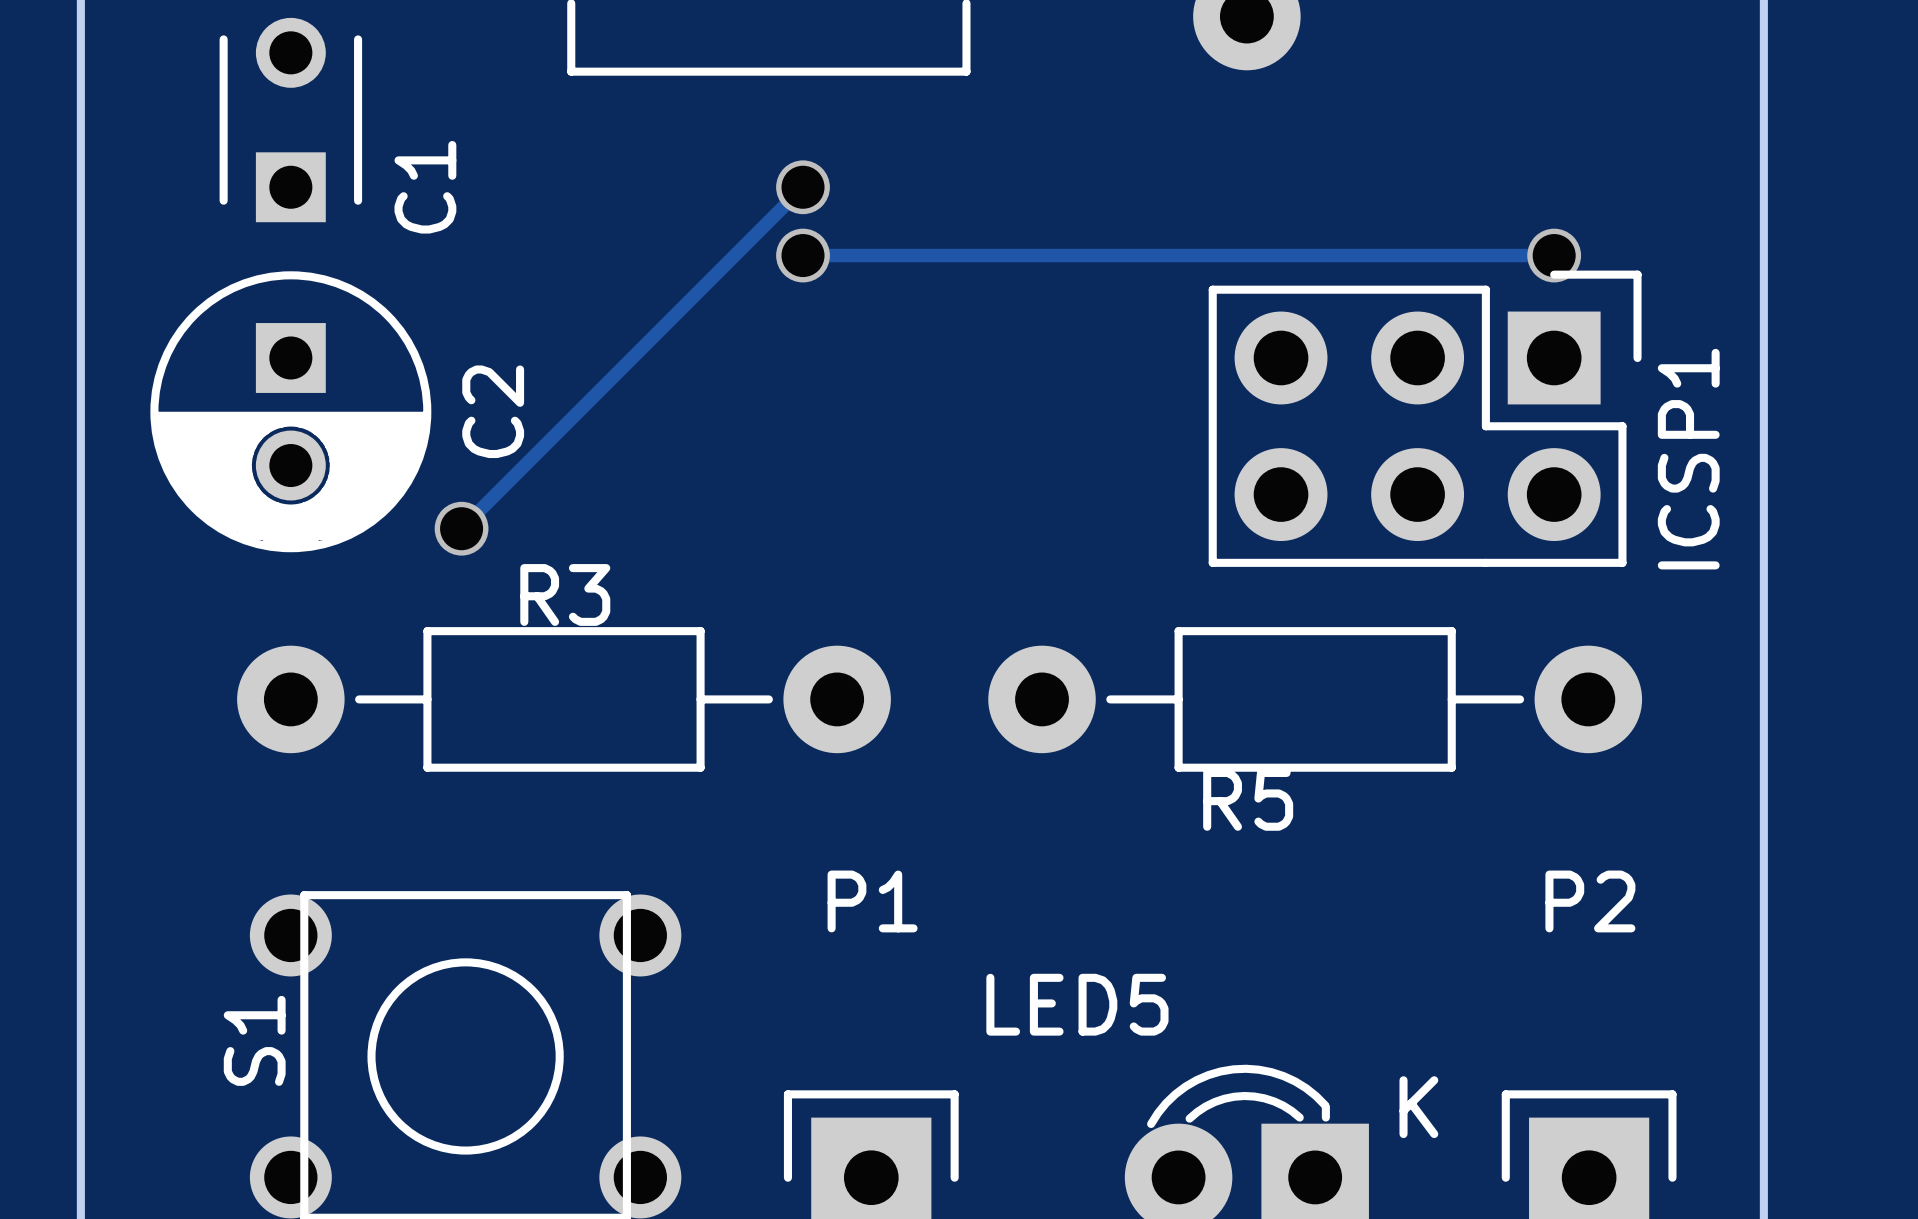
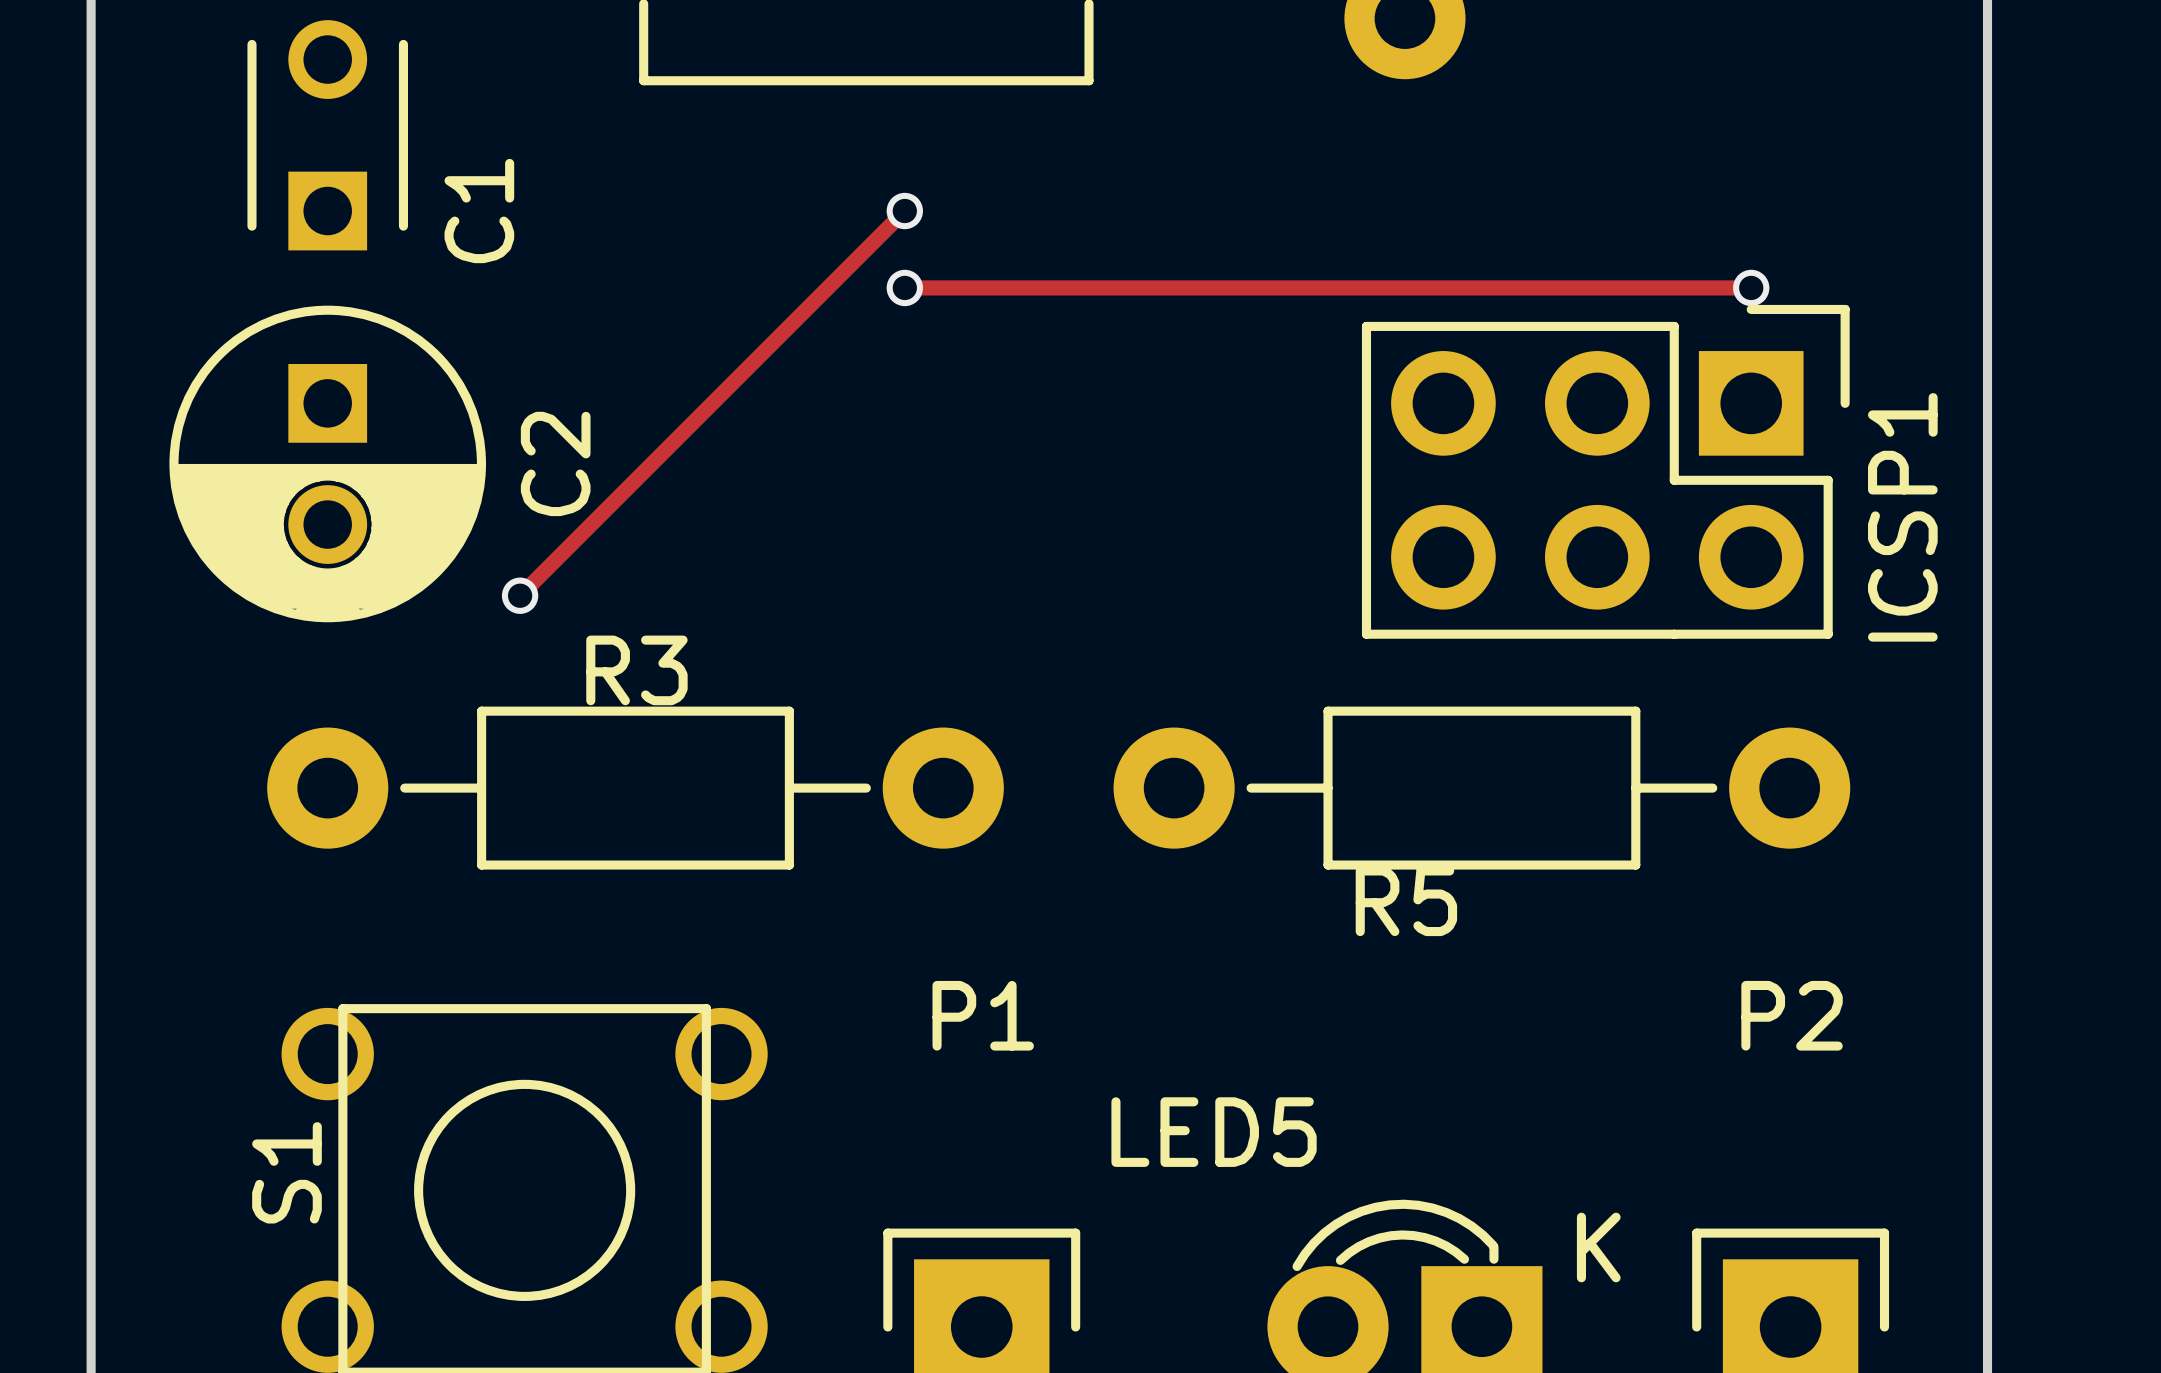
via size: [776, 160, 830, 215] -> [886, 192, 923, 230]
via size: [776, 228, 830, 283] -> [886, 269, 923, 307]
via size: [1527, 228, 1582, 283] -> [1733, 269, 1770, 307]
via size: [434, 501, 489, 556] -> [501, 577, 539, 614]

